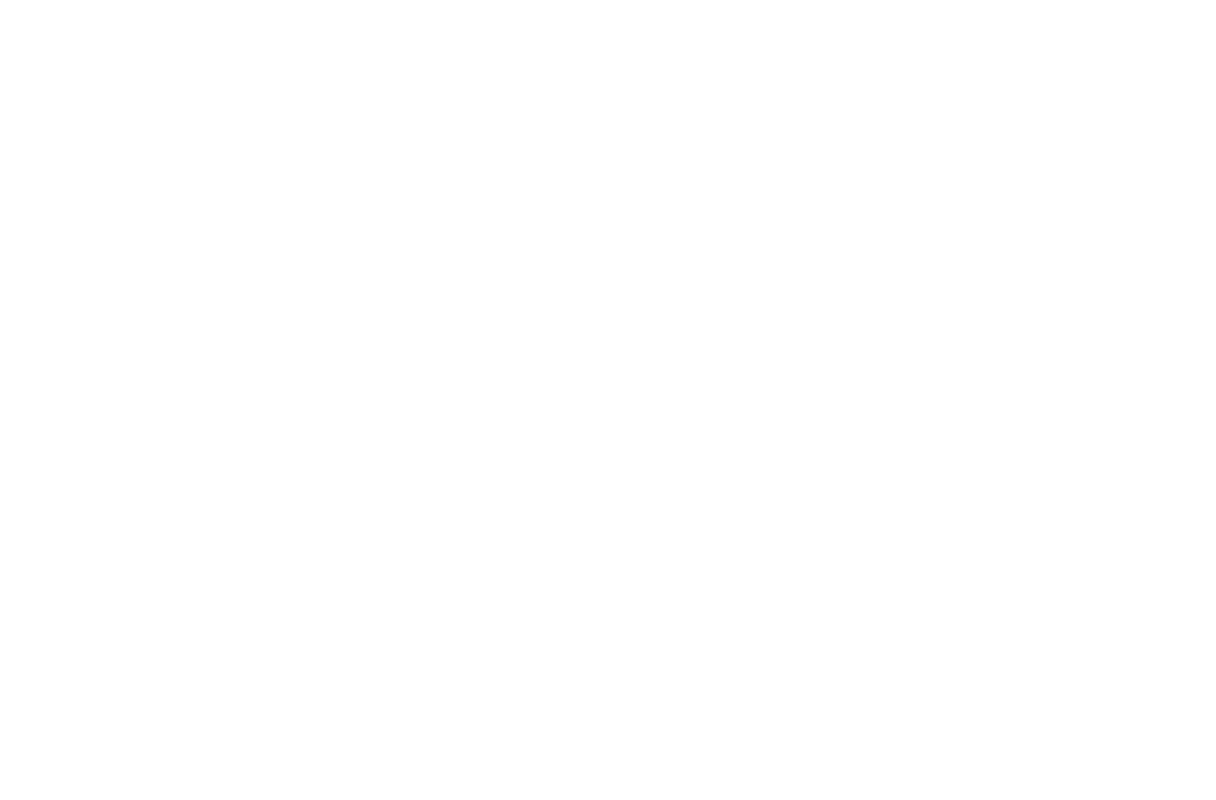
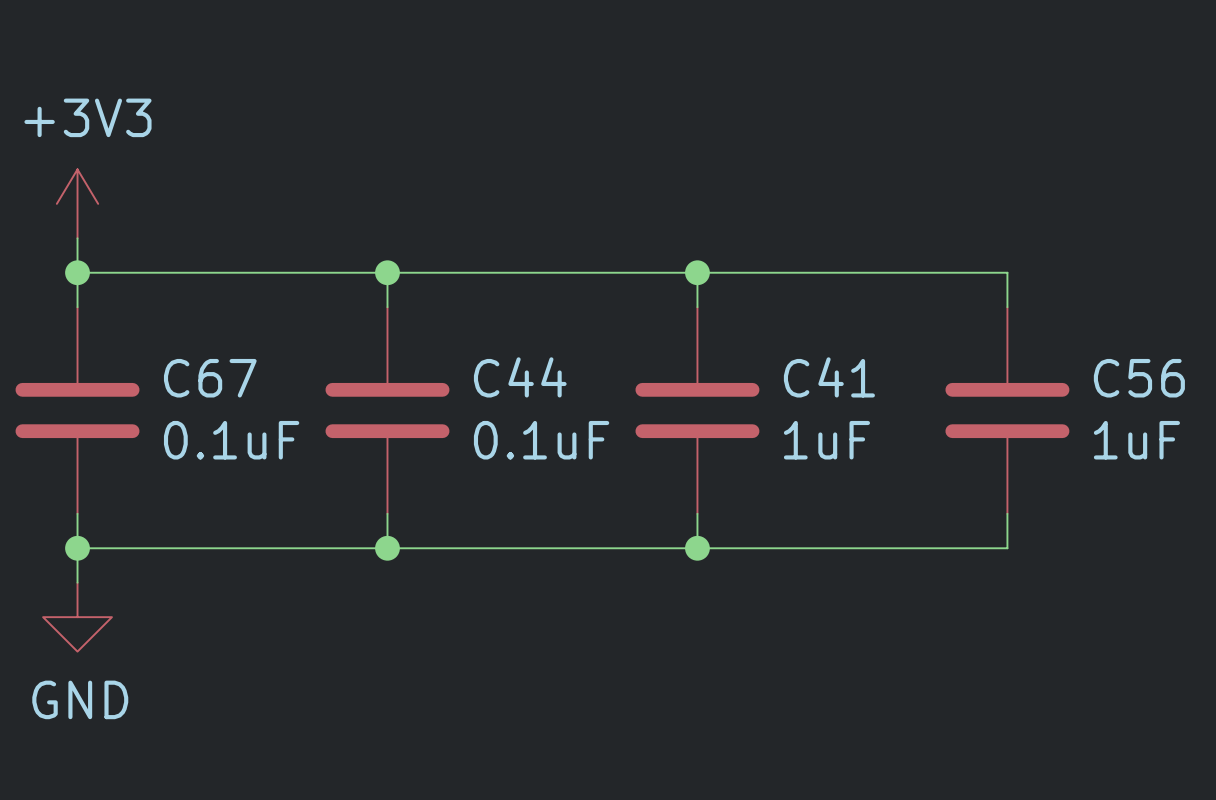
power symbol: none -> +3V3 (77, 203)
wire: none -> (77, 238) (77, 307)
wire: none -> (77, 272) (1007, 272) (1007, 307)
junction: none -> (77, 272)
wire: none -> (387, 272) (387, 307)
junction: none -> (387, 272)
wire: none -> (697, 272) (697, 307)
junction: none -> (697, 272)
C67: none -> 0.1uF (77, 410)
C44: none -> 0.1uF (387, 410)
C41: none -> 1uF (697, 410)
C56: none -> 1uF (1007, 410)
wire: none -> (77, 513) (77, 582)
wire: none -> (387, 513) (387, 548)
wire: none -> (697, 513) (697, 548)
wire: none -> (1007, 513) (1007, 548) (77, 548)
junction: none -> (77, 548)
junction: none -> (387, 548)
junction: none -> (697, 548)
power symbol: none -> GND (77, 617)

